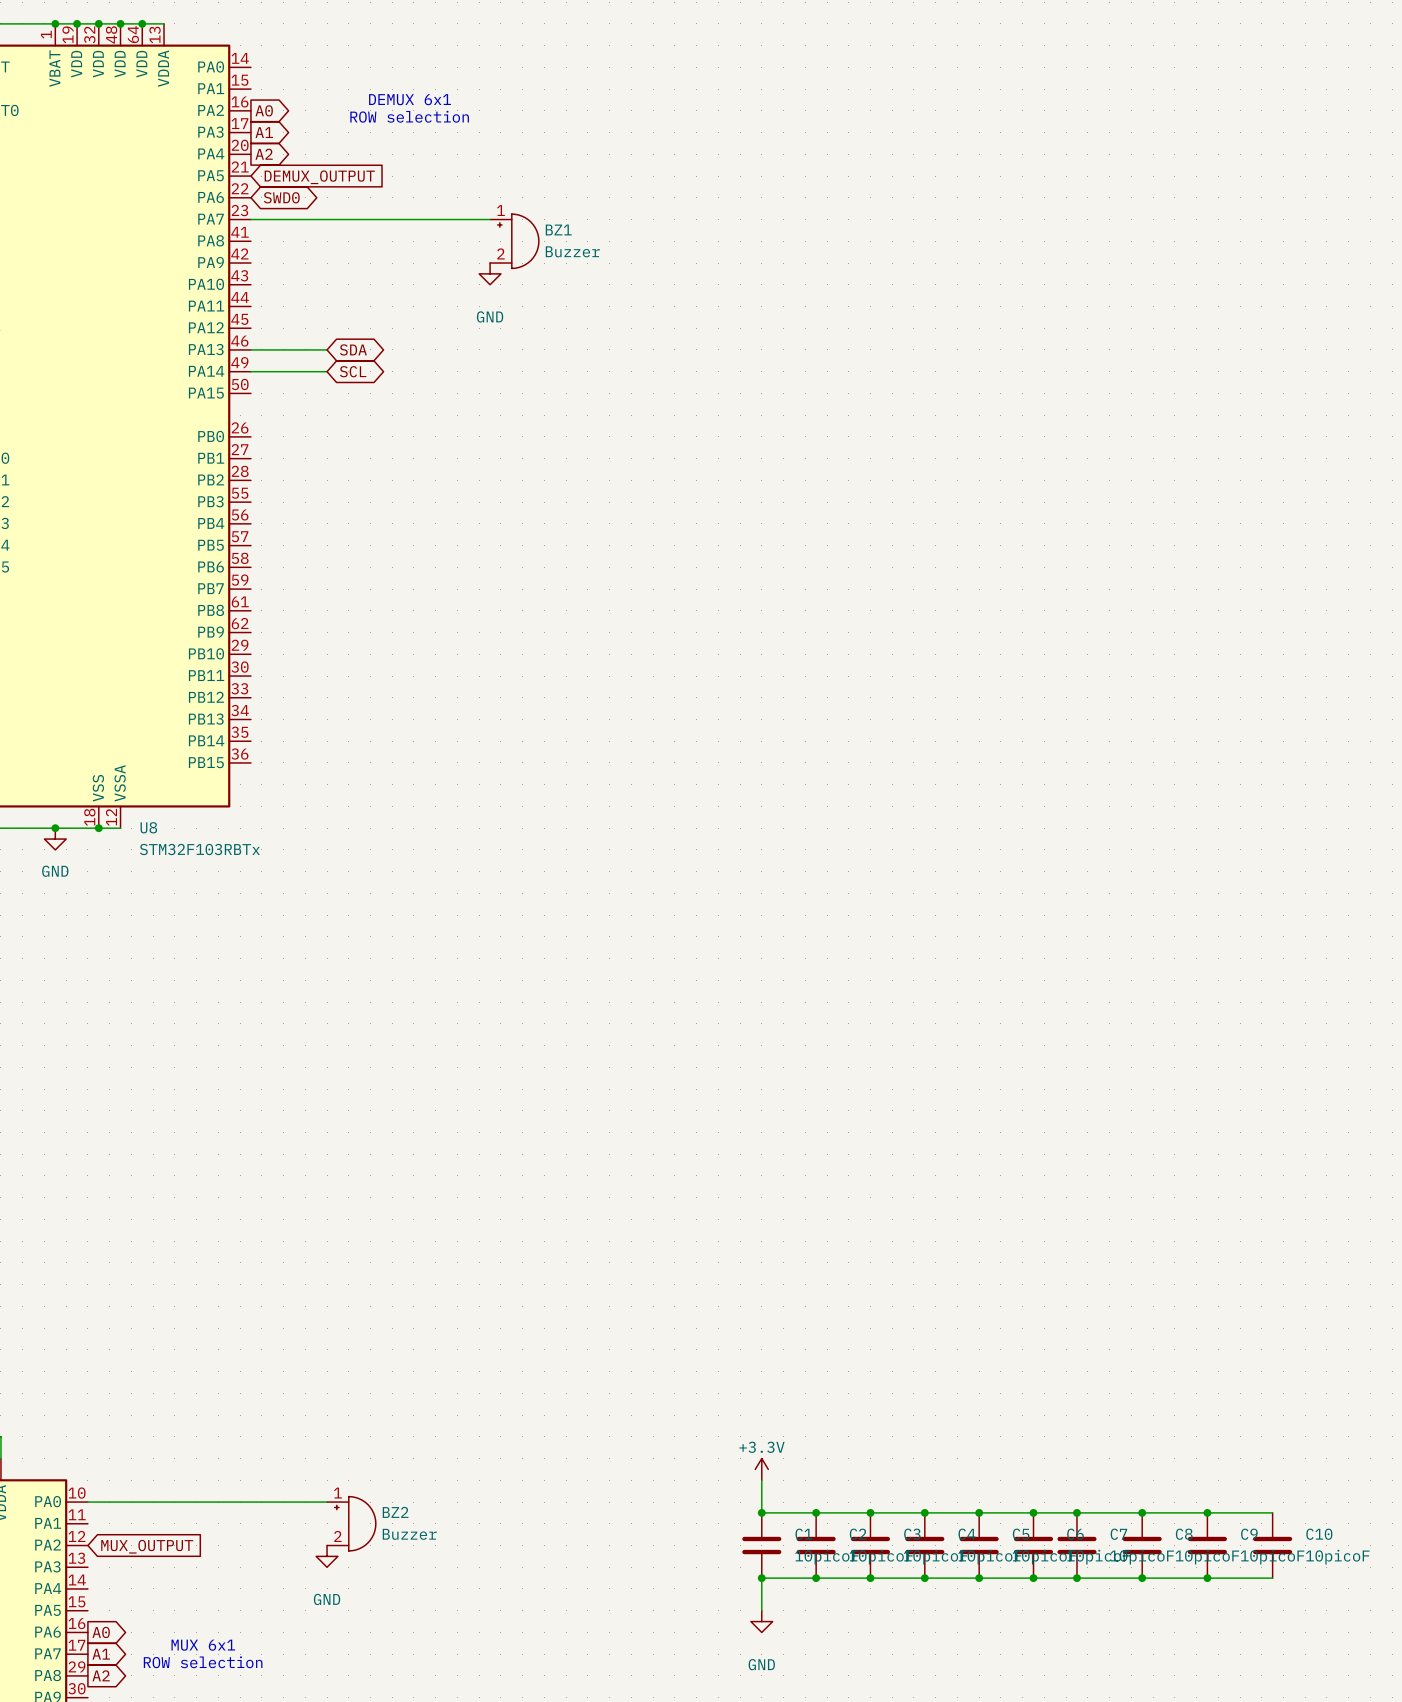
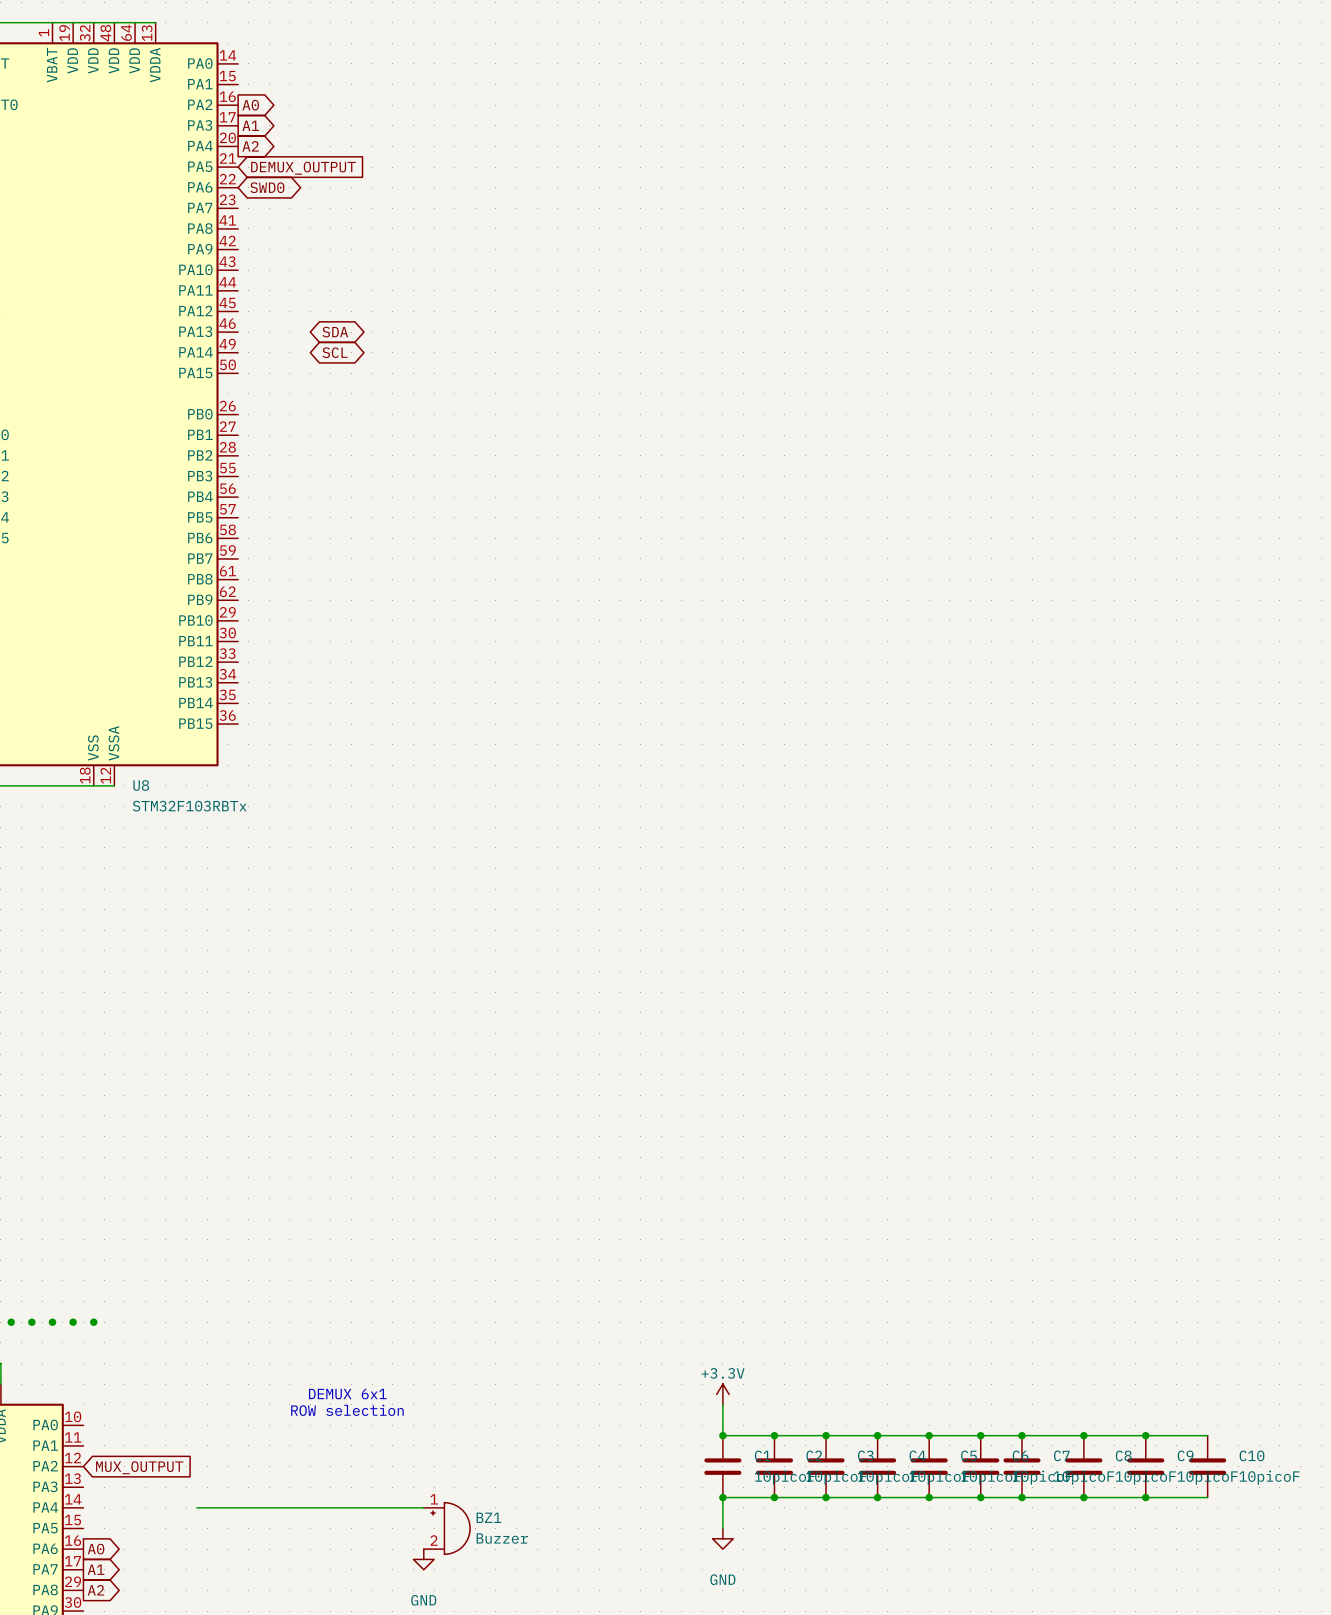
junction: (55, 23) -> none
junction: (77, 23) -> none
junction: (98, 23) -> none
junction: (120, 23) -> none
junction: (142, 23) -> none
text: DEMUX 6x1 (410, 99) -> none
text: ROW selection (409, 116) -> none
wire: (250, 219) (490, 219) -> none
BZ1 position: (514, 241) -> (446, 1528)
power symbol: GND (490, 273) -> none
wire: (250, 349) (327, 349) -> none
wire: (250, 371) (327, 371) -> none
junction: (55, 828) -> none
junction: (98, 828) -> none
power symbol: GND (55, 839) -> none
junction: none -> (11, 1322)
junction: none -> (31, 1322)
junction: none -> (52, 1322)
junction: none -> (73, 1322)
junction: none -> (93, 1322)
text: none -> DEMUX 6x1 (347, 1394)
text: none -> ROW selection (347, 1410)
wire: (87, 1502) (327, 1502) -> (196, 1507) (423, 1507)
BZ2: Buzzer (351, 1523) -> none
power symbol position: GND (327, 1556) -> GND (423, 1559)
text: MUX 6x1 (203, 1645) -> none
text: ROW selection (203, 1662) -> none

